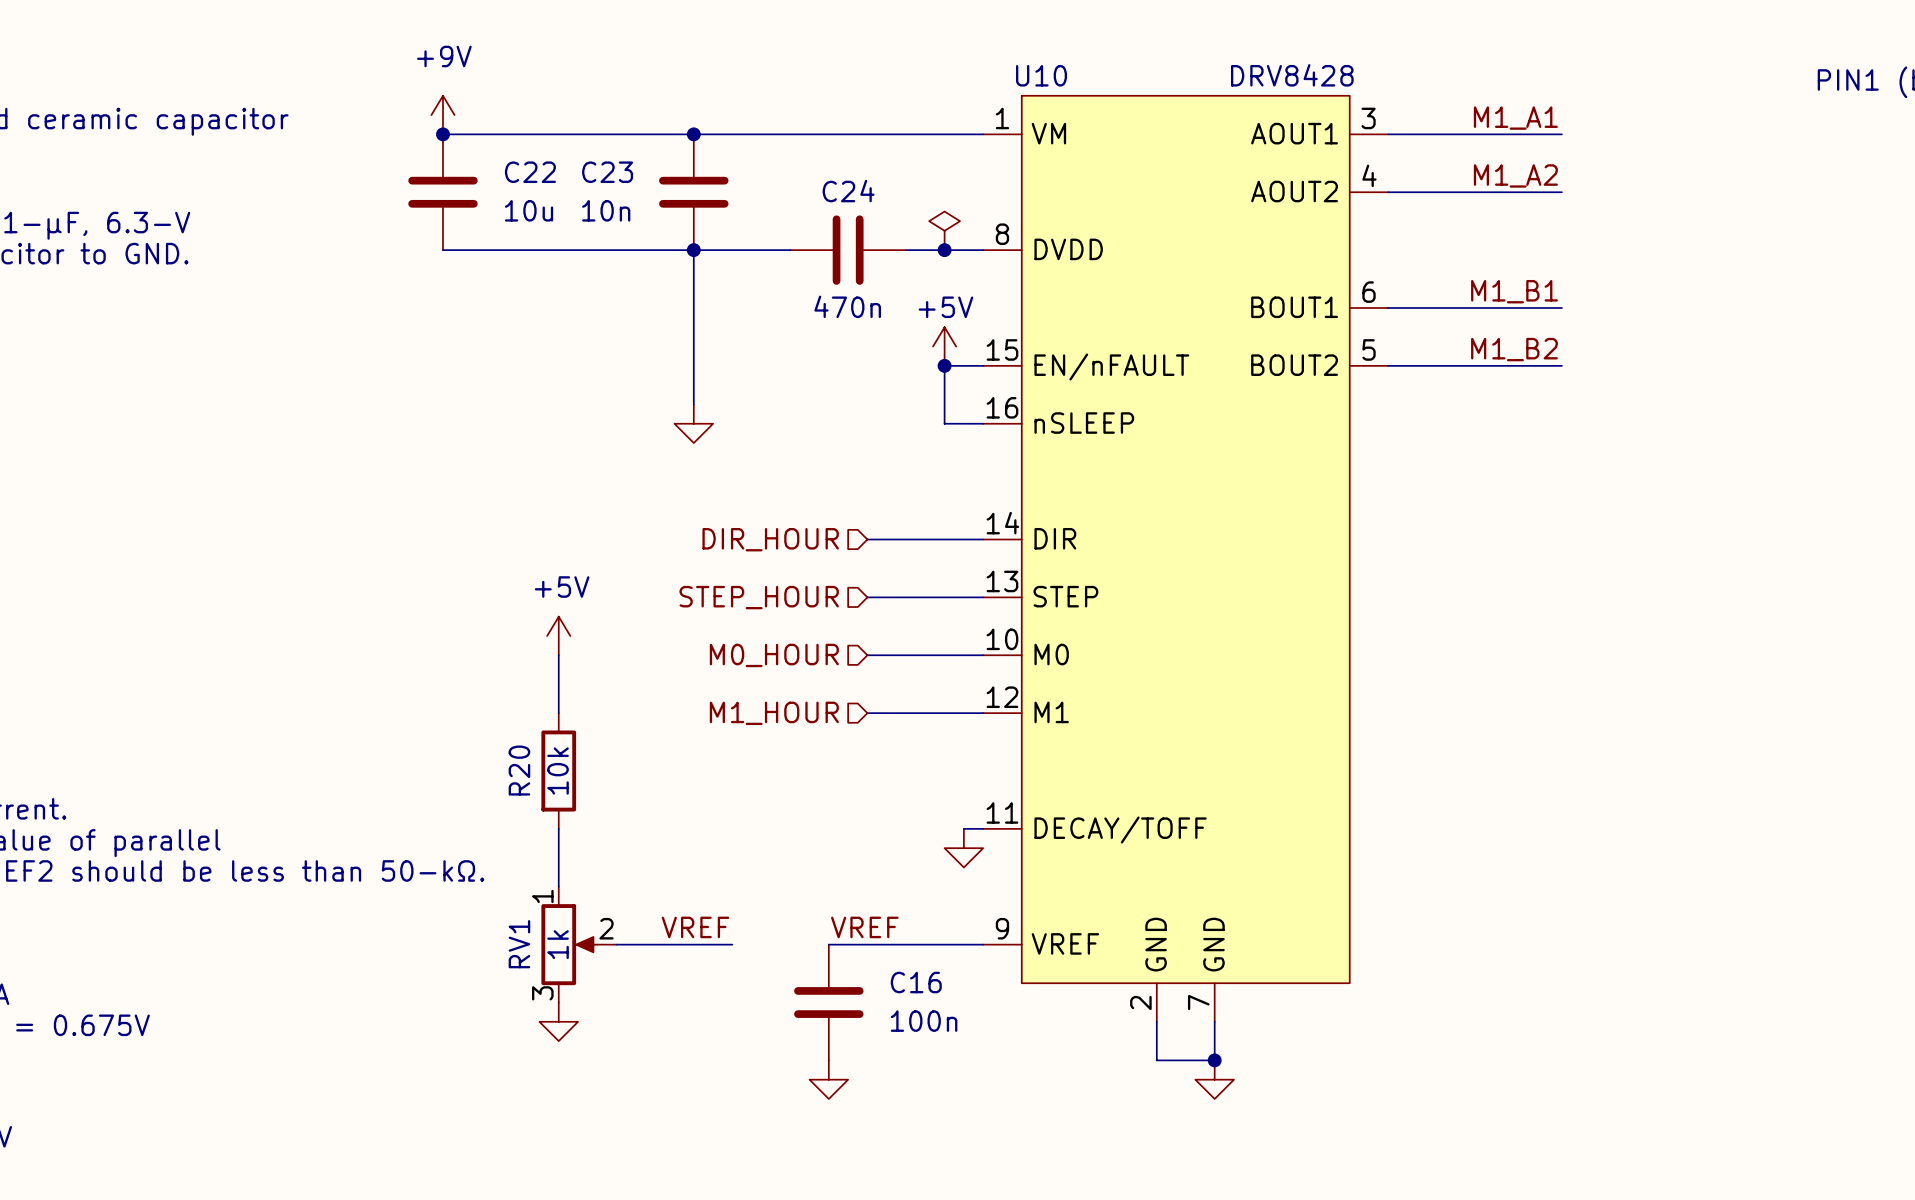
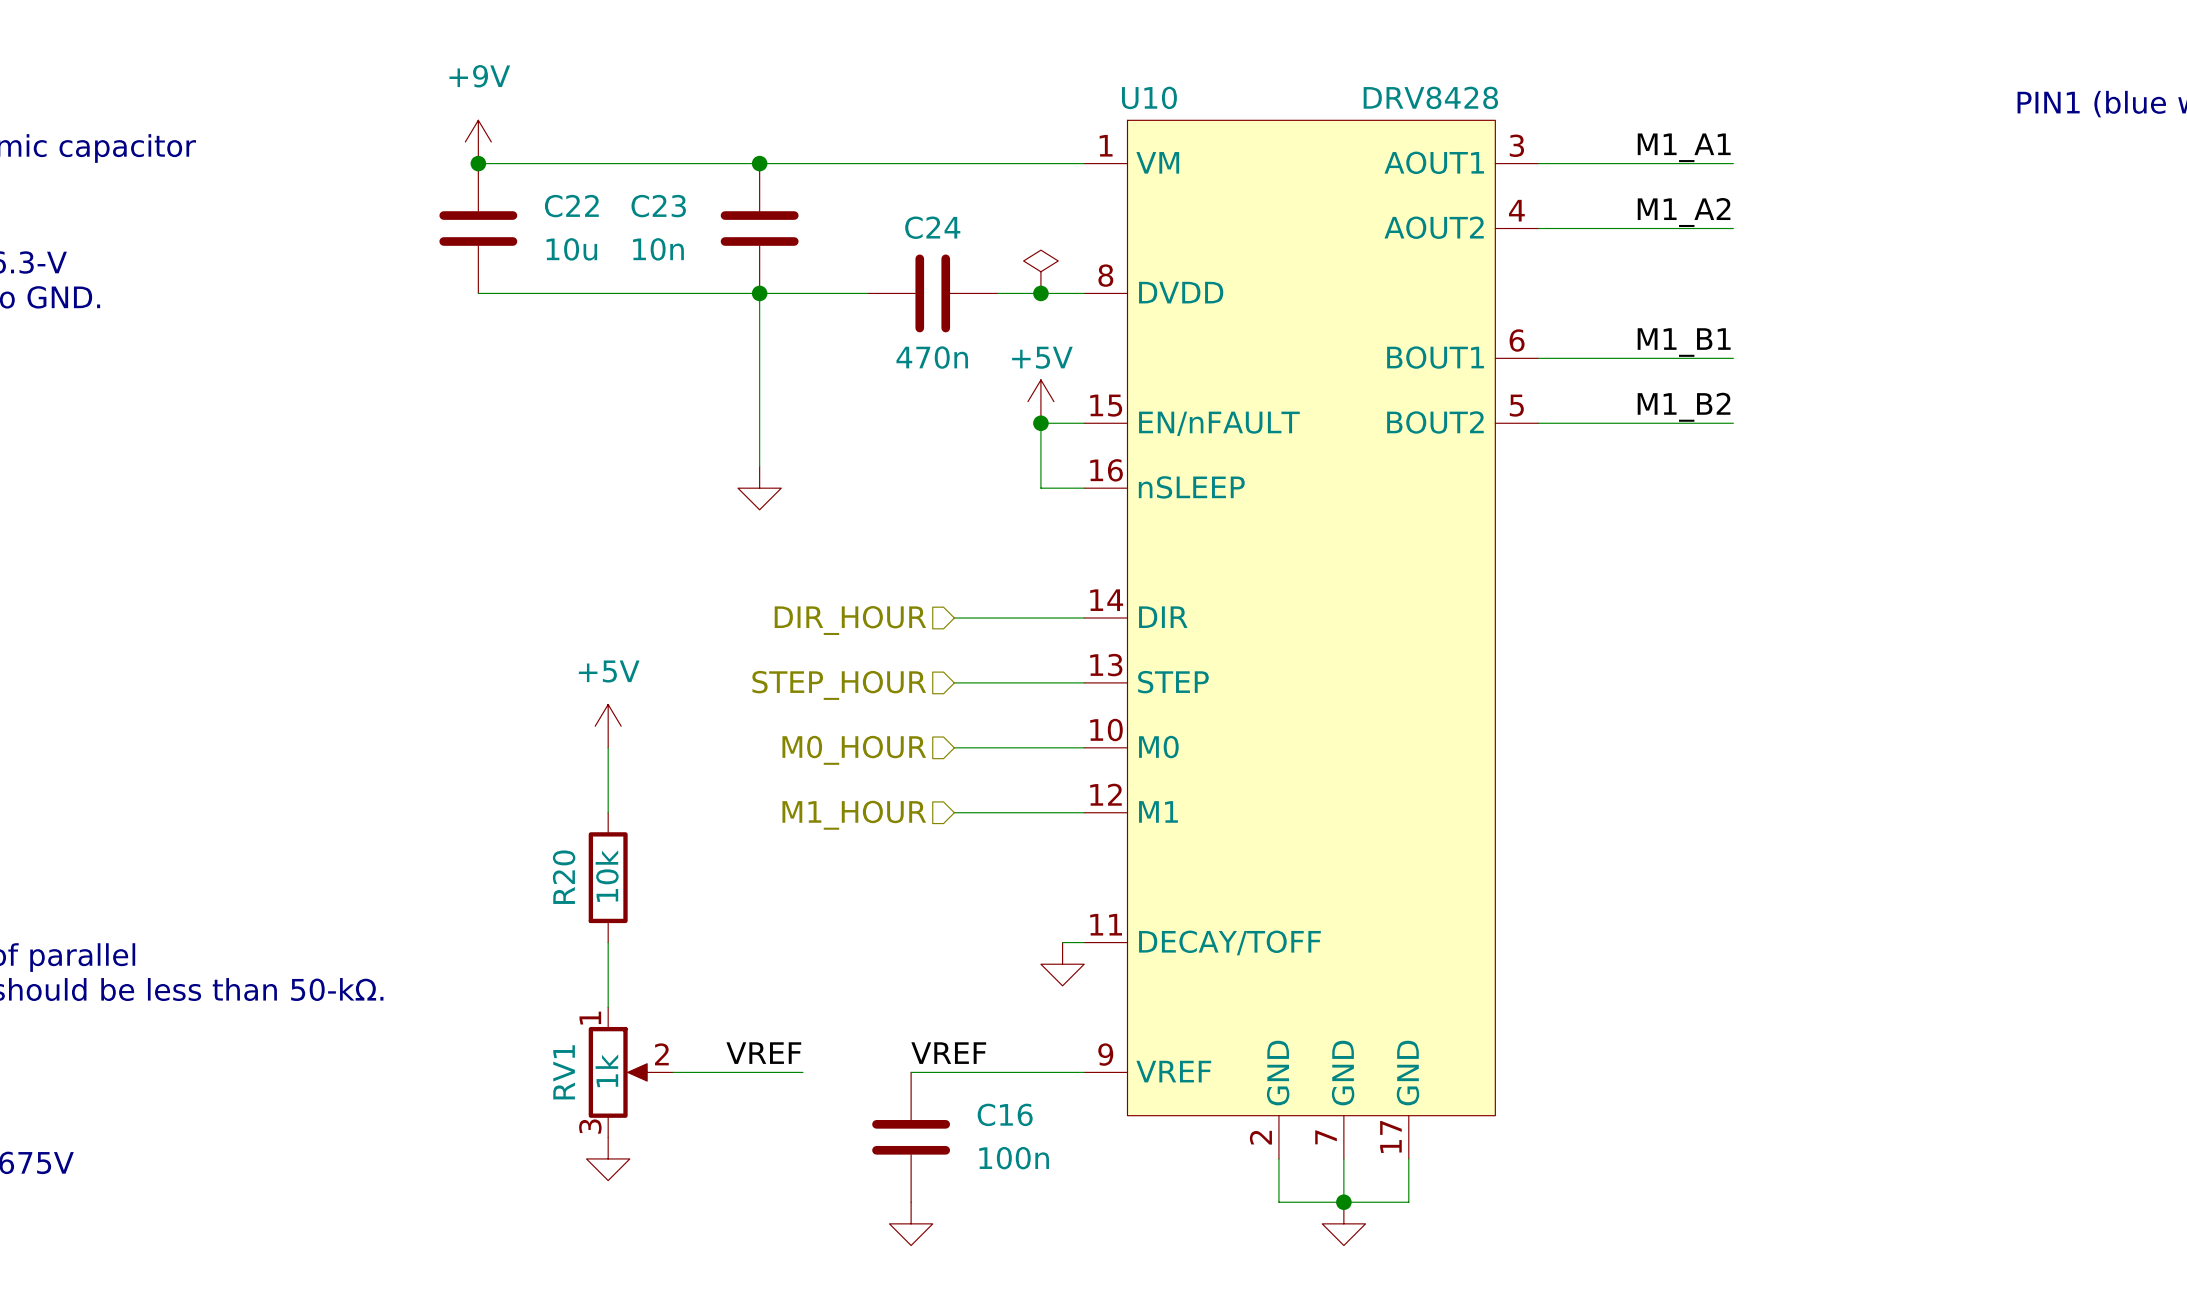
U10 symbol: [983, 95, 1389, 1022] -> [1084, 120, 1539, 1159]
wire: none -> (1408, 1158) (1408, 1202) (1343, 1202)

